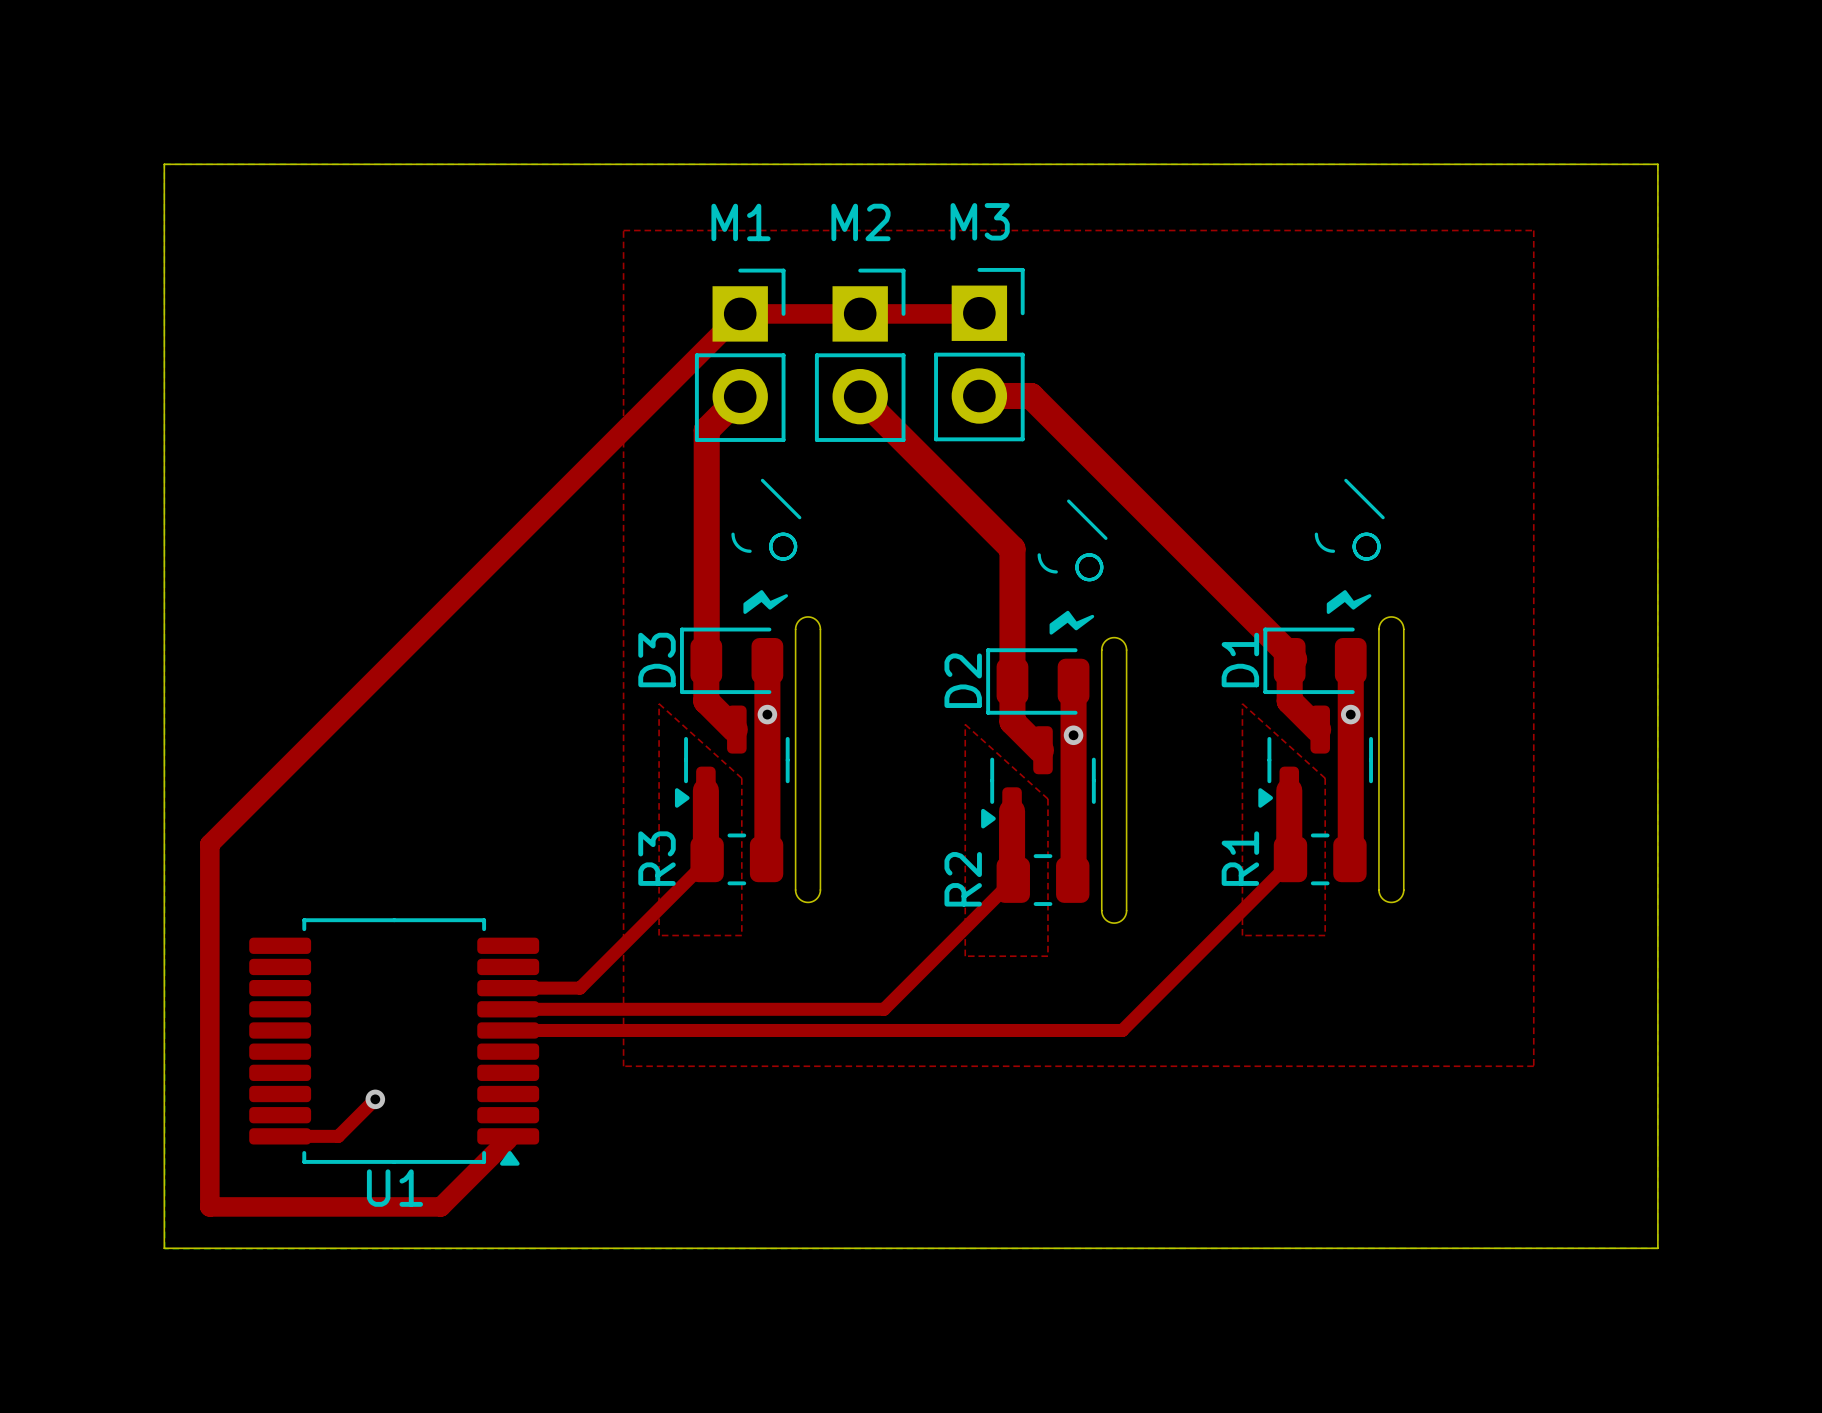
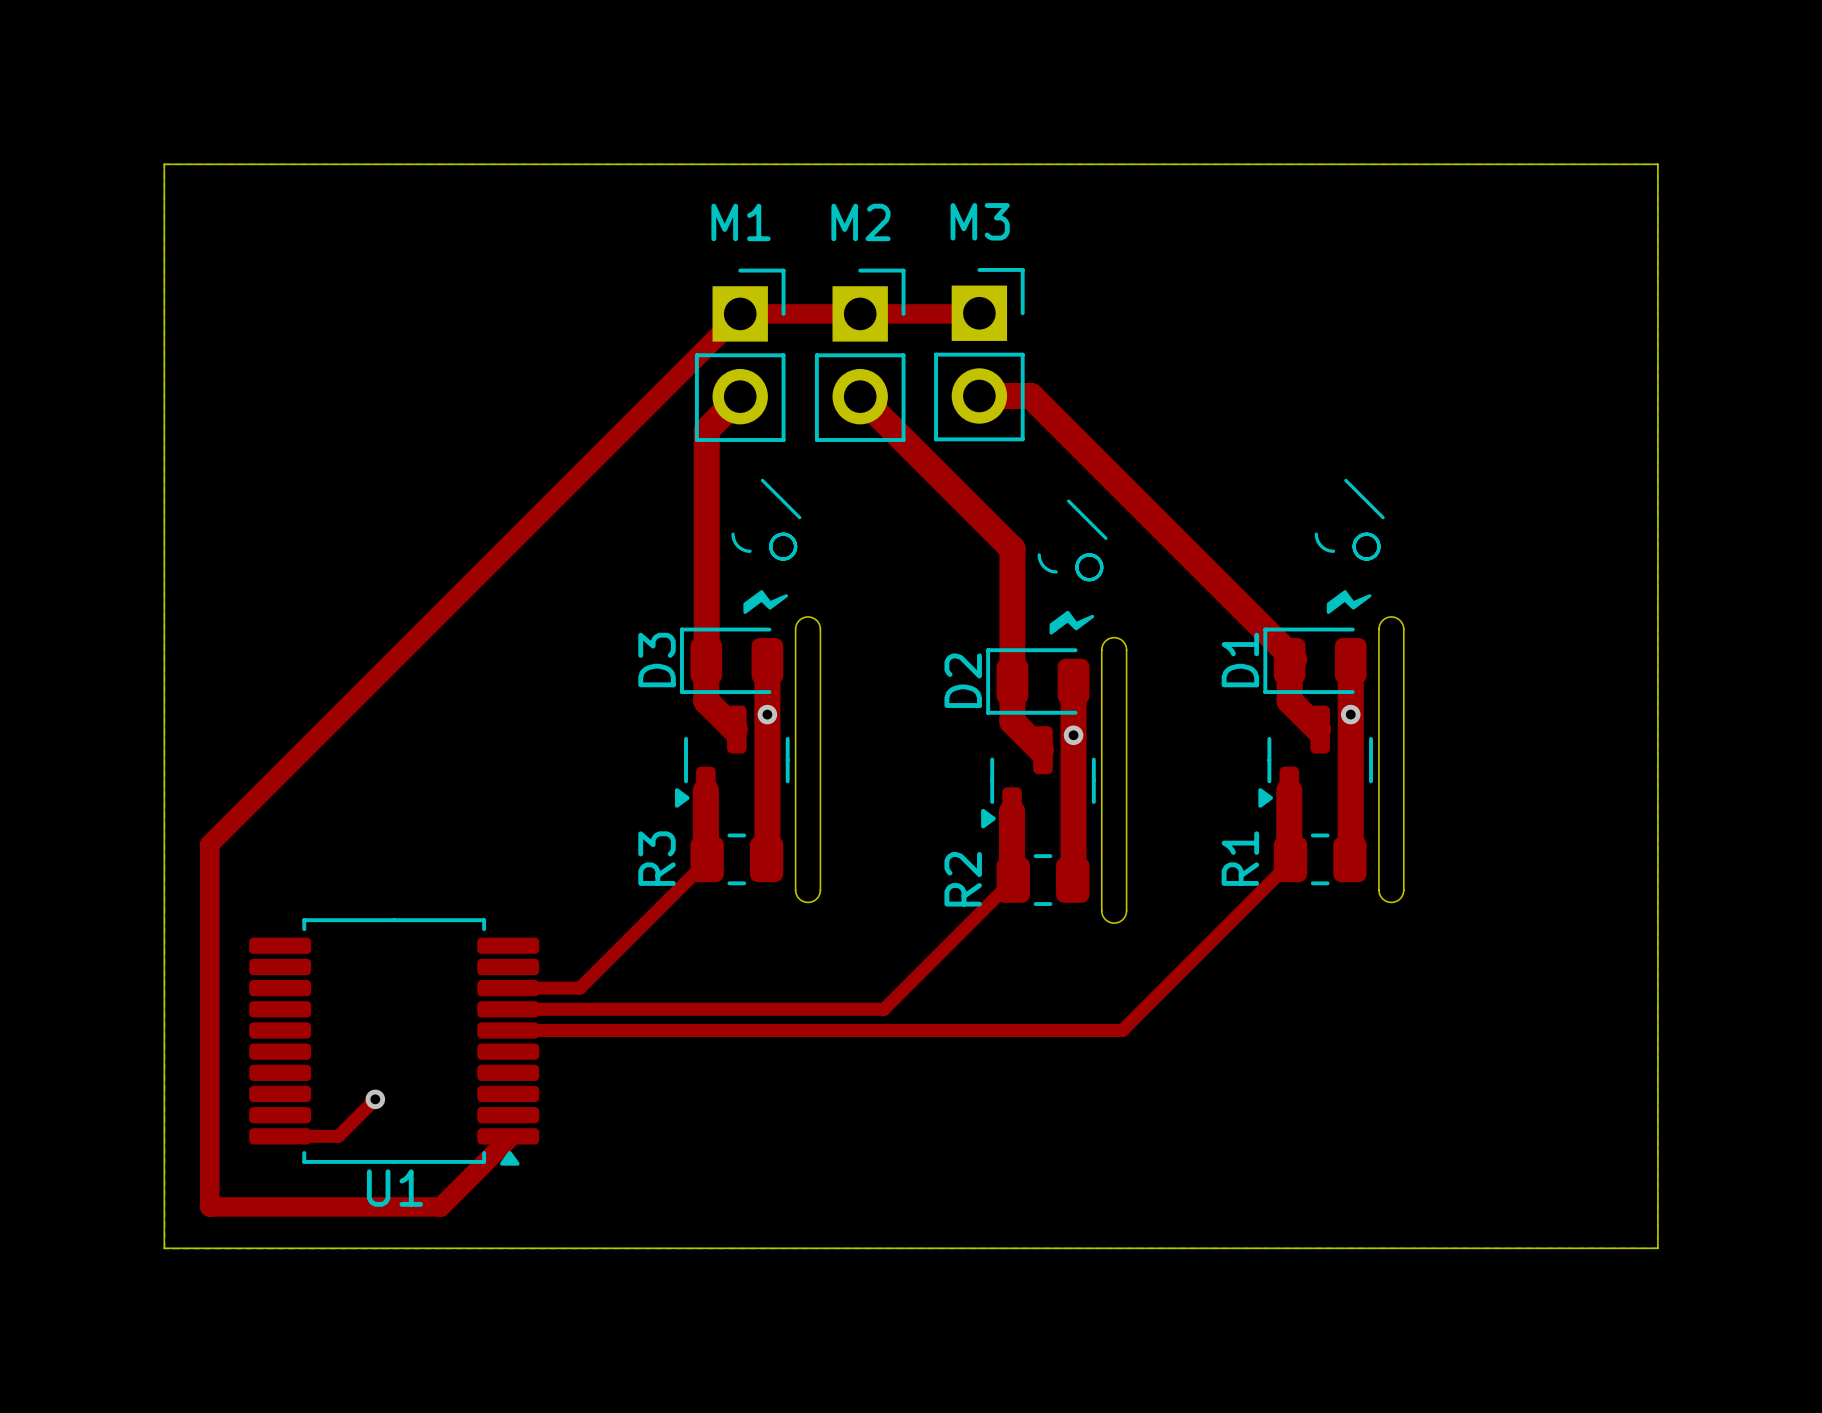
top zone outline: (623, 230) (1533, 230) (1533, 1066) (623, 1066) (623, 230) -> none
top zone outline: (659, 703) (659, 935) (741, 935) (741, 778) (659, 703) -> none
top zone outline: (1242, 703) (1242, 935) (1325, 935) (1325, 778) (1242, 703) -> none
top zone outline: (965, 724) (965, 956) (1047, 956) (1047, 798) (965, 724) -> none

